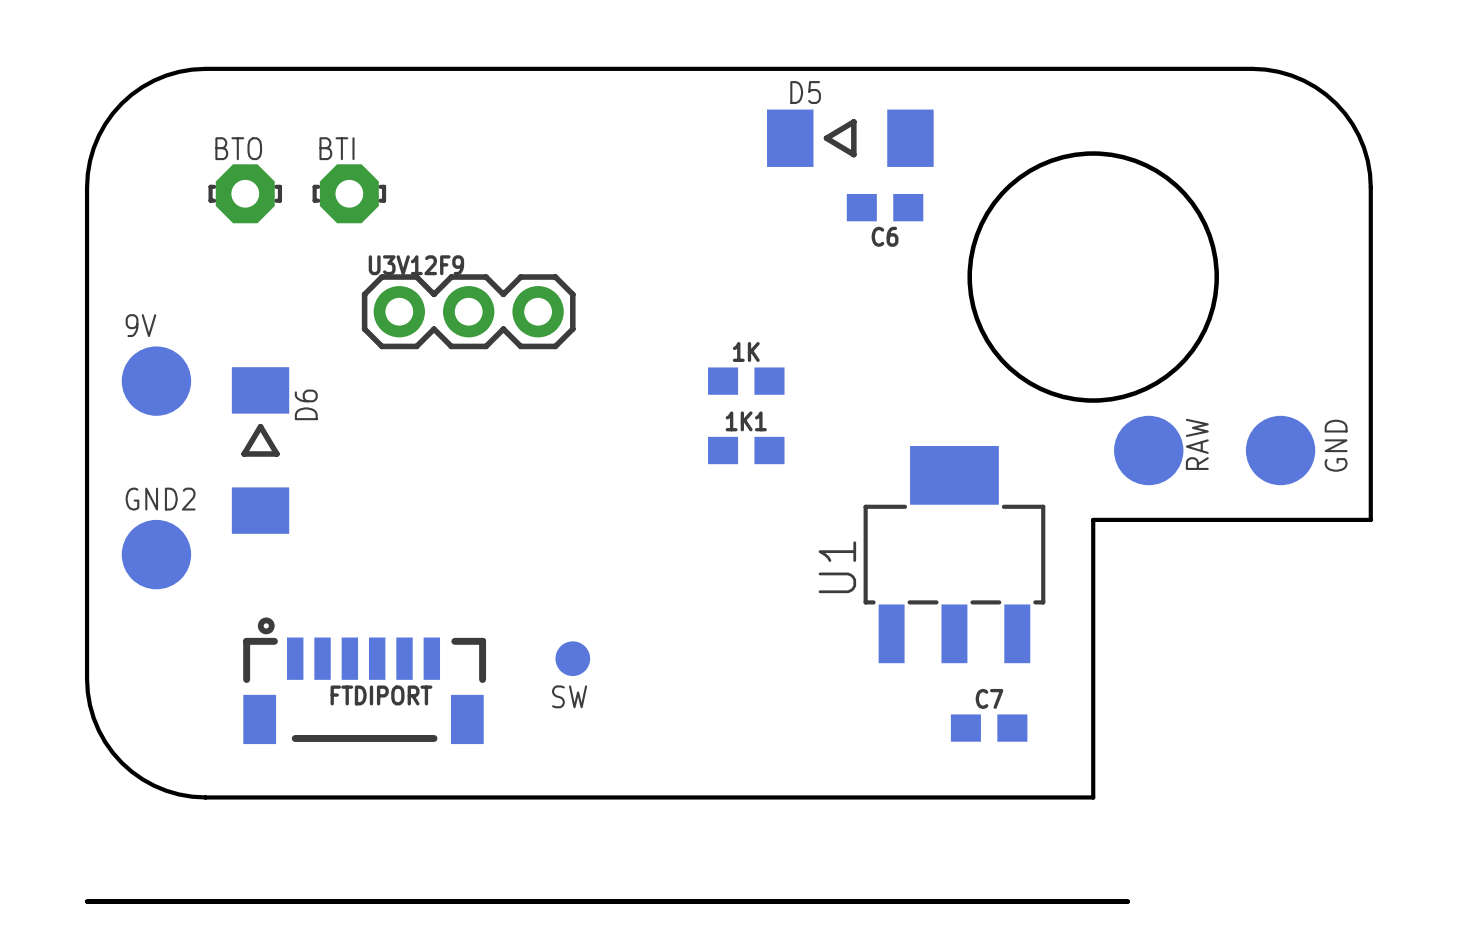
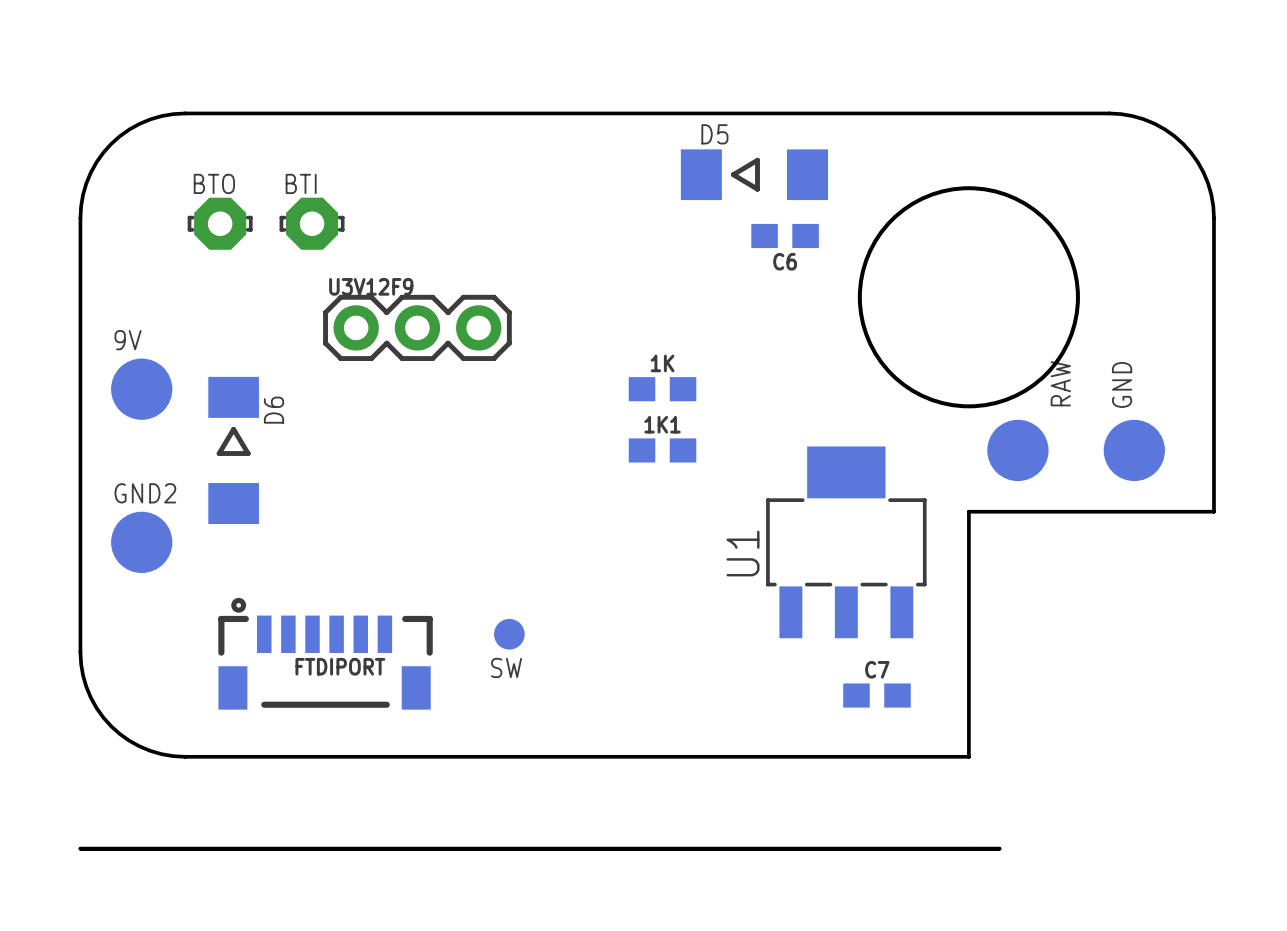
RAW name position: RAW (1197, 444) -> RAW (1060, 383)
GND name position: GND (1336, 445) -> GND (1122, 384)

